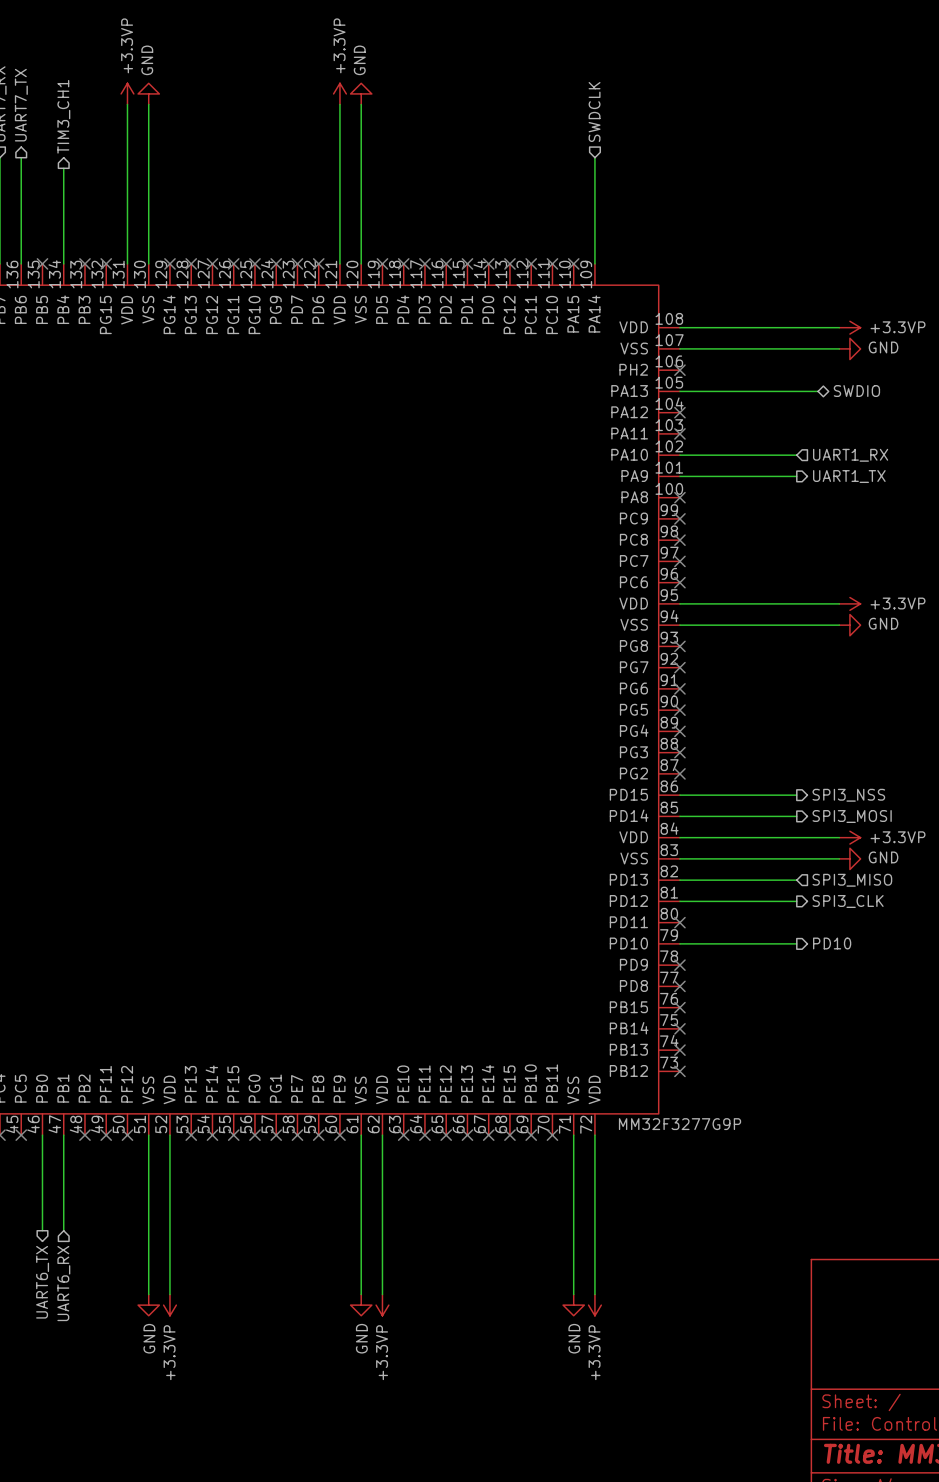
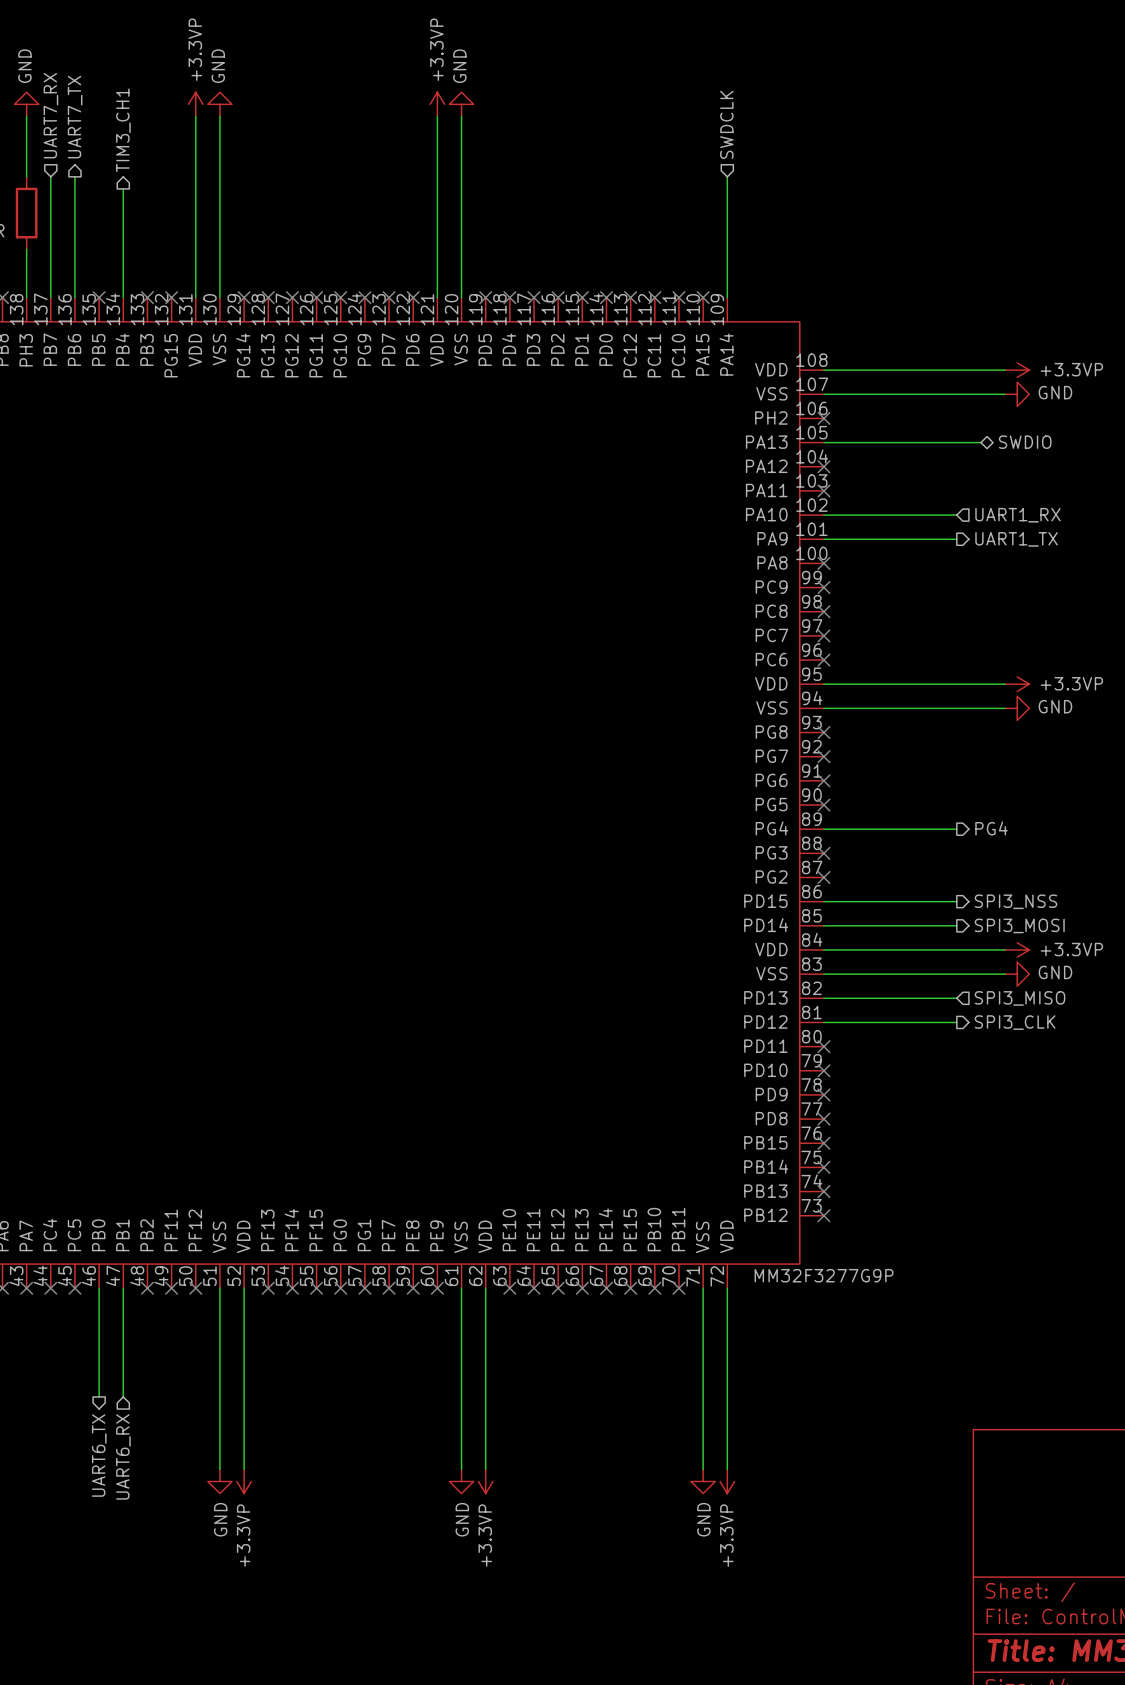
hierarchical label: none -> PG4 (991, 828)
wire: none -> (823, 829) (956, 829)
no-connect mark: (679, 731) -> none
wire: (679, 943) (796, 943) -> none
no-connect mark: none -> (823, 1070)
hierarchical label: PD10 (832, 943) -> none

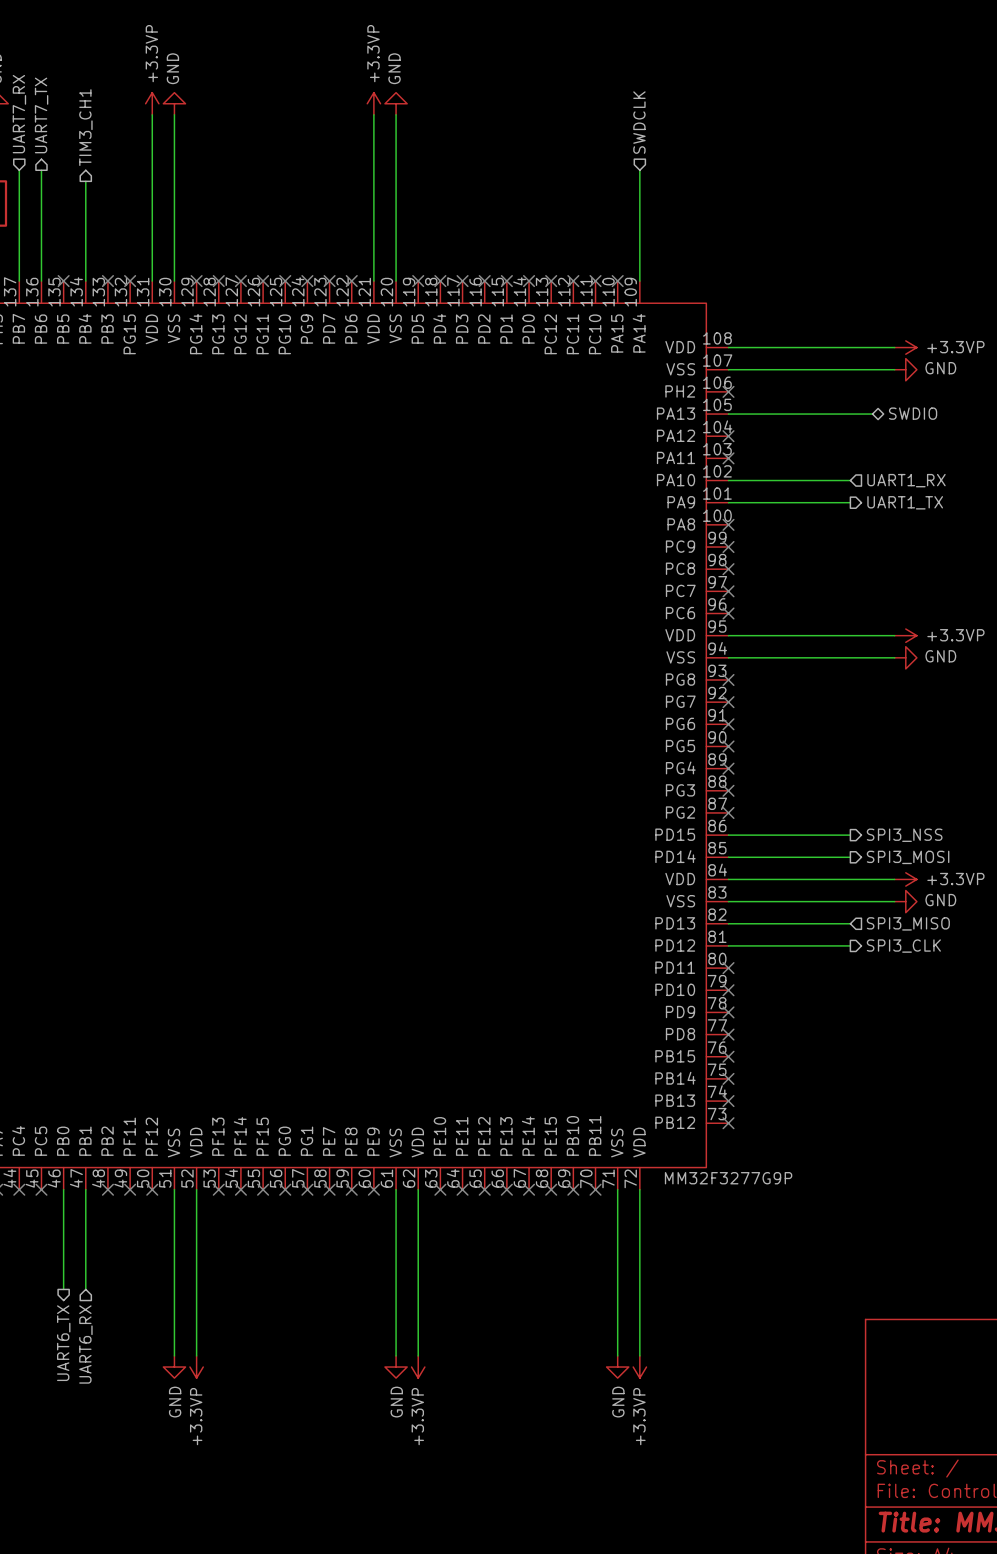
hierarchical label: PG4 (991, 828) -> none
wire: (823, 829) (956, 829) -> none
no-connect mark: none -> (728, 768)

